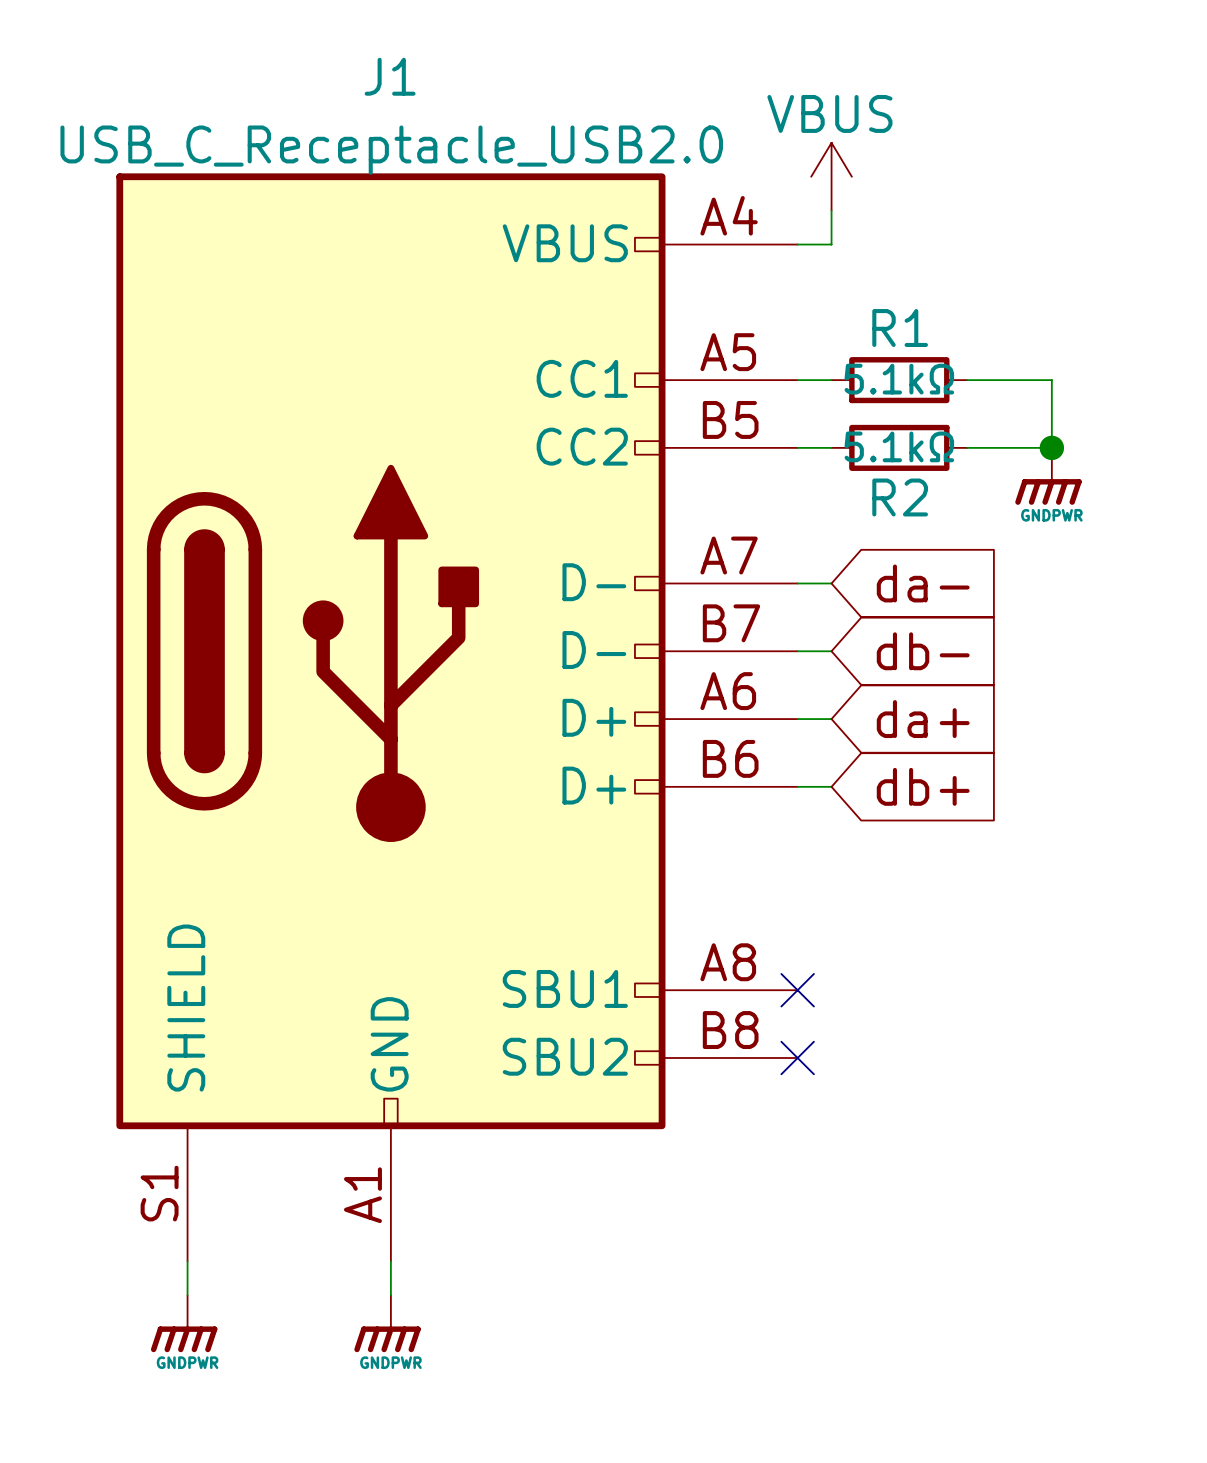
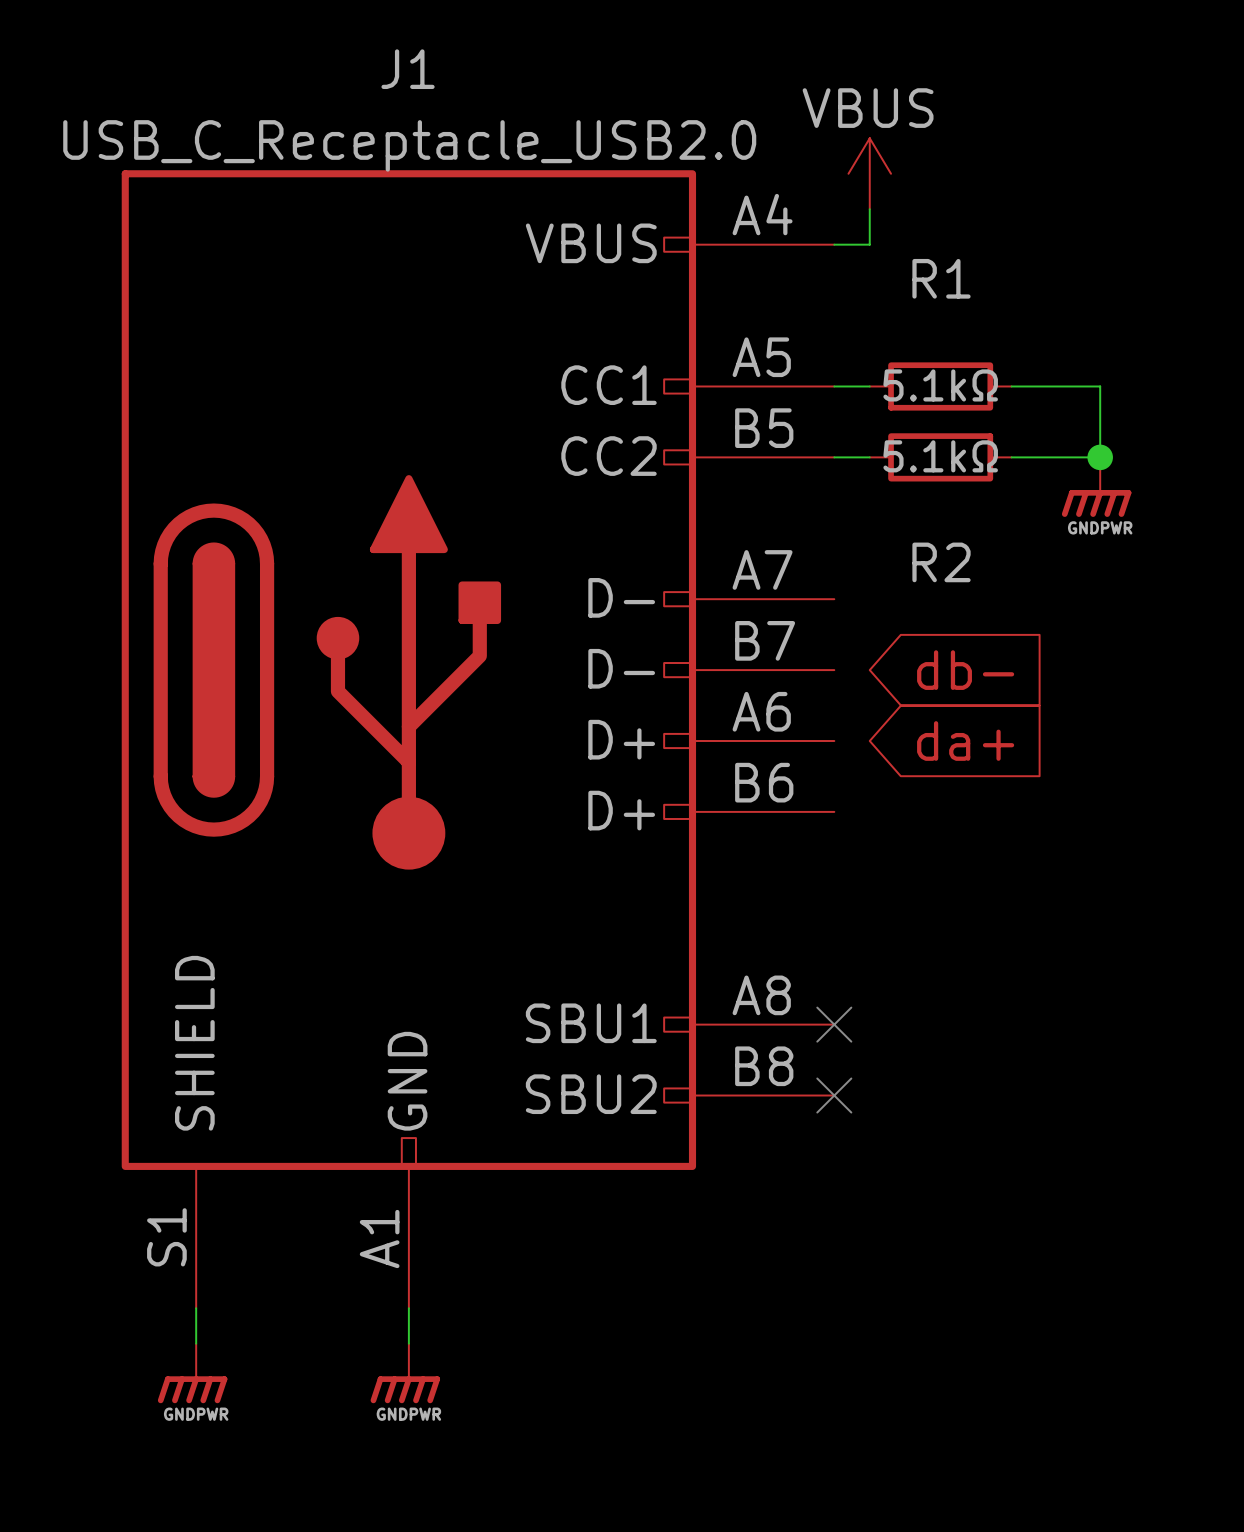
R1 name position: R1 (900, 328) -> R1 (941, 278)
R2 name position: R2 (900, 497) -> R2 (941, 562)
wire: (797, 583) (831, 583) -> none
global label: da- (923, 583) -> none
wire: (797, 651) (831, 651) -> none
wire: (797, 719) (831, 719) -> none
wire: (797, 786) (831, 786) -> none
global label: db+ (923, 786) -> none

